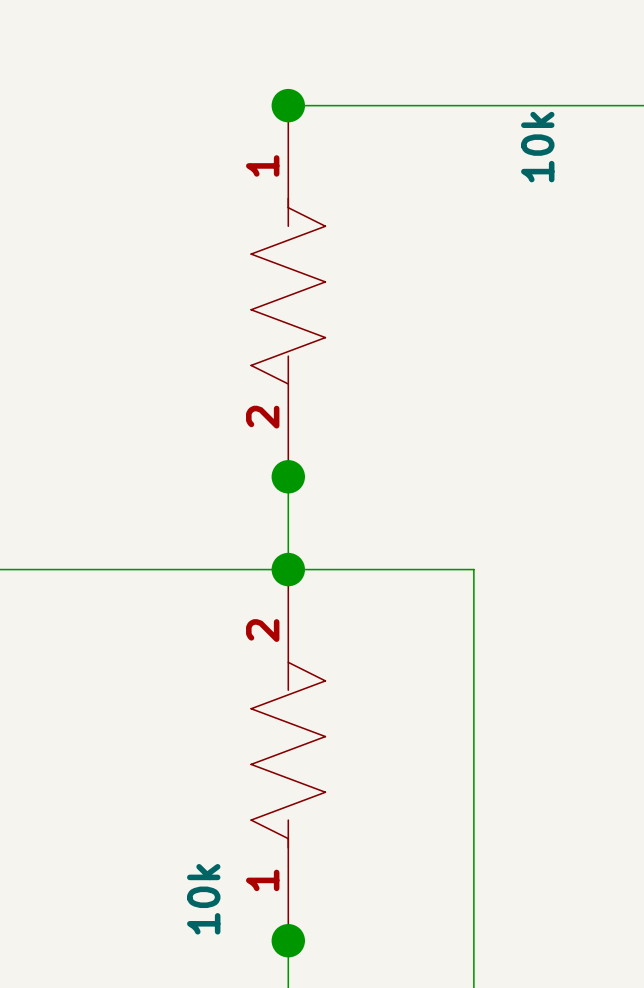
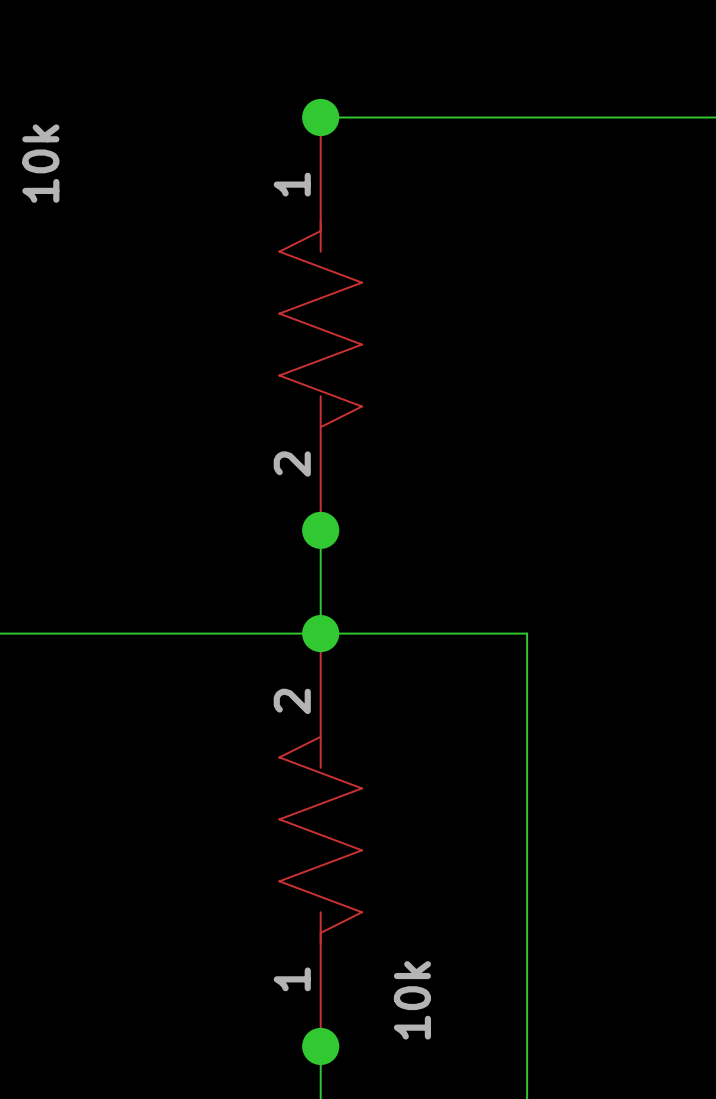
part flip: as is (288, 291) -> left-right (320, 323)
part flip: as is (288, 755) -> left-right (320, 840)

